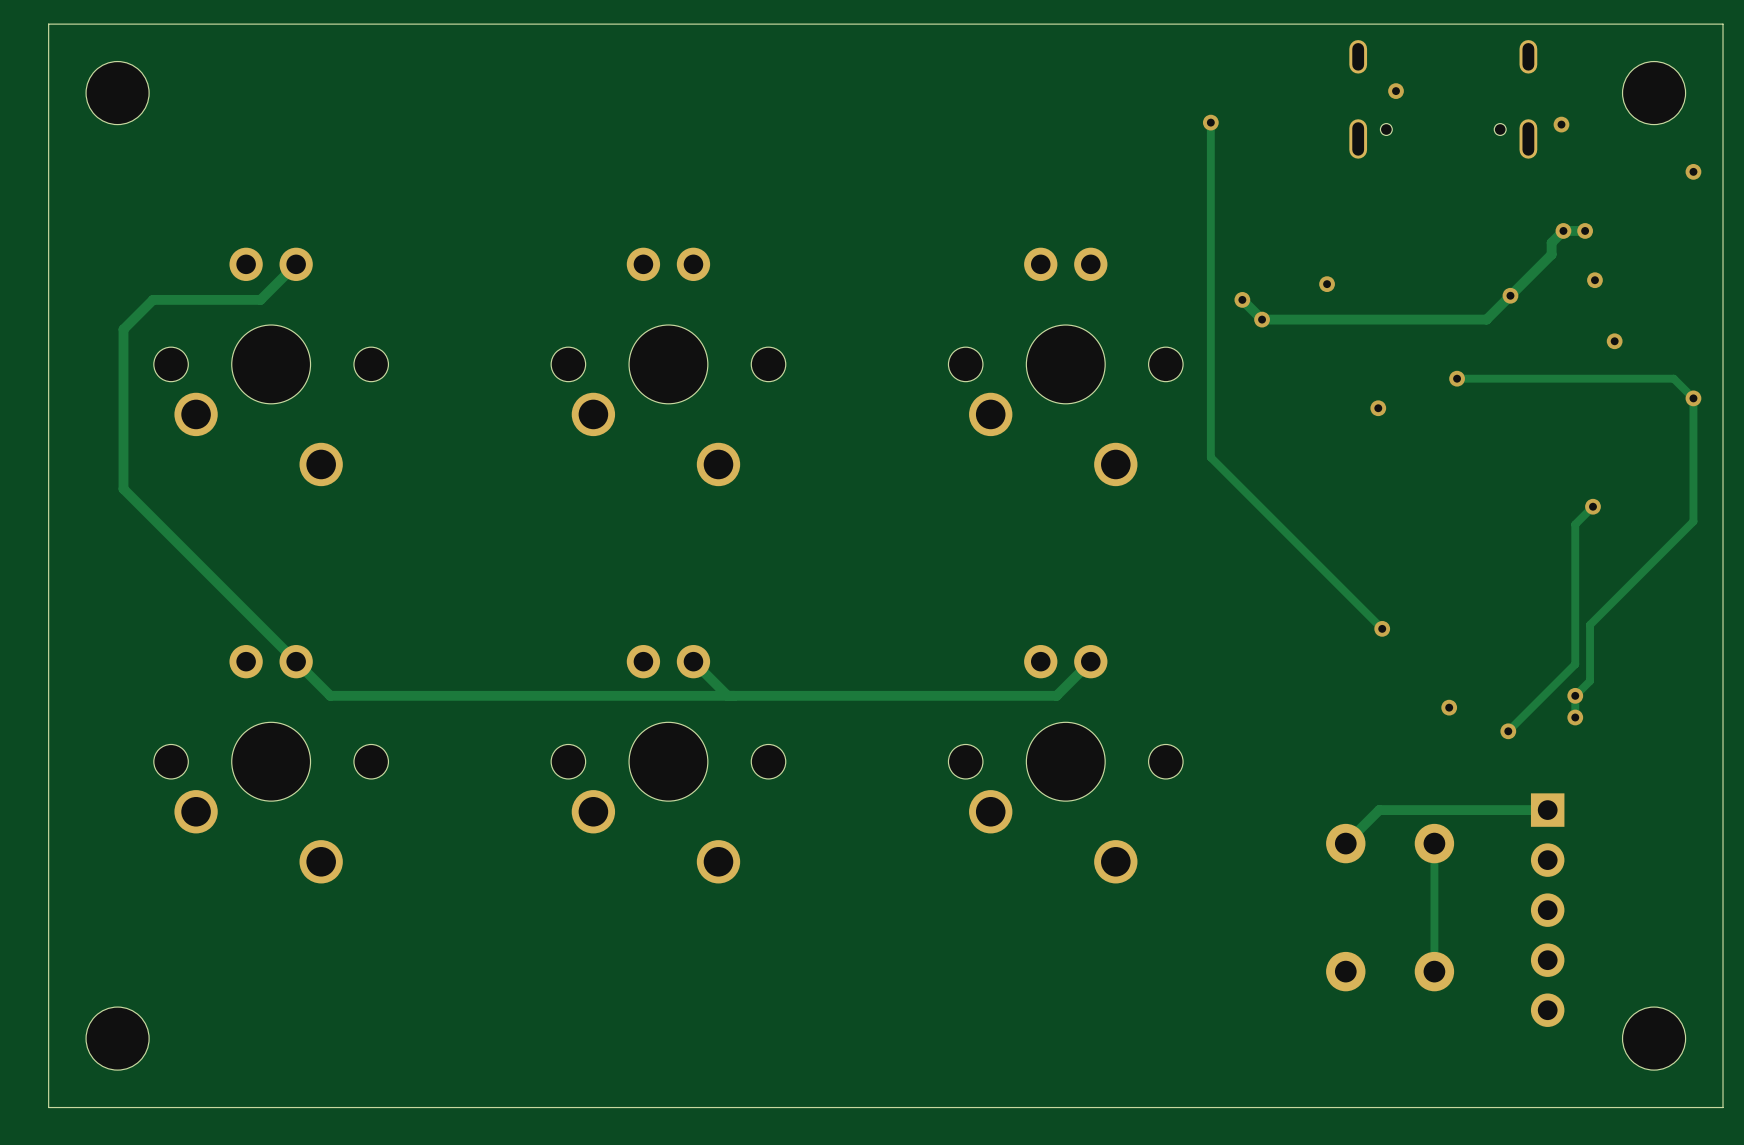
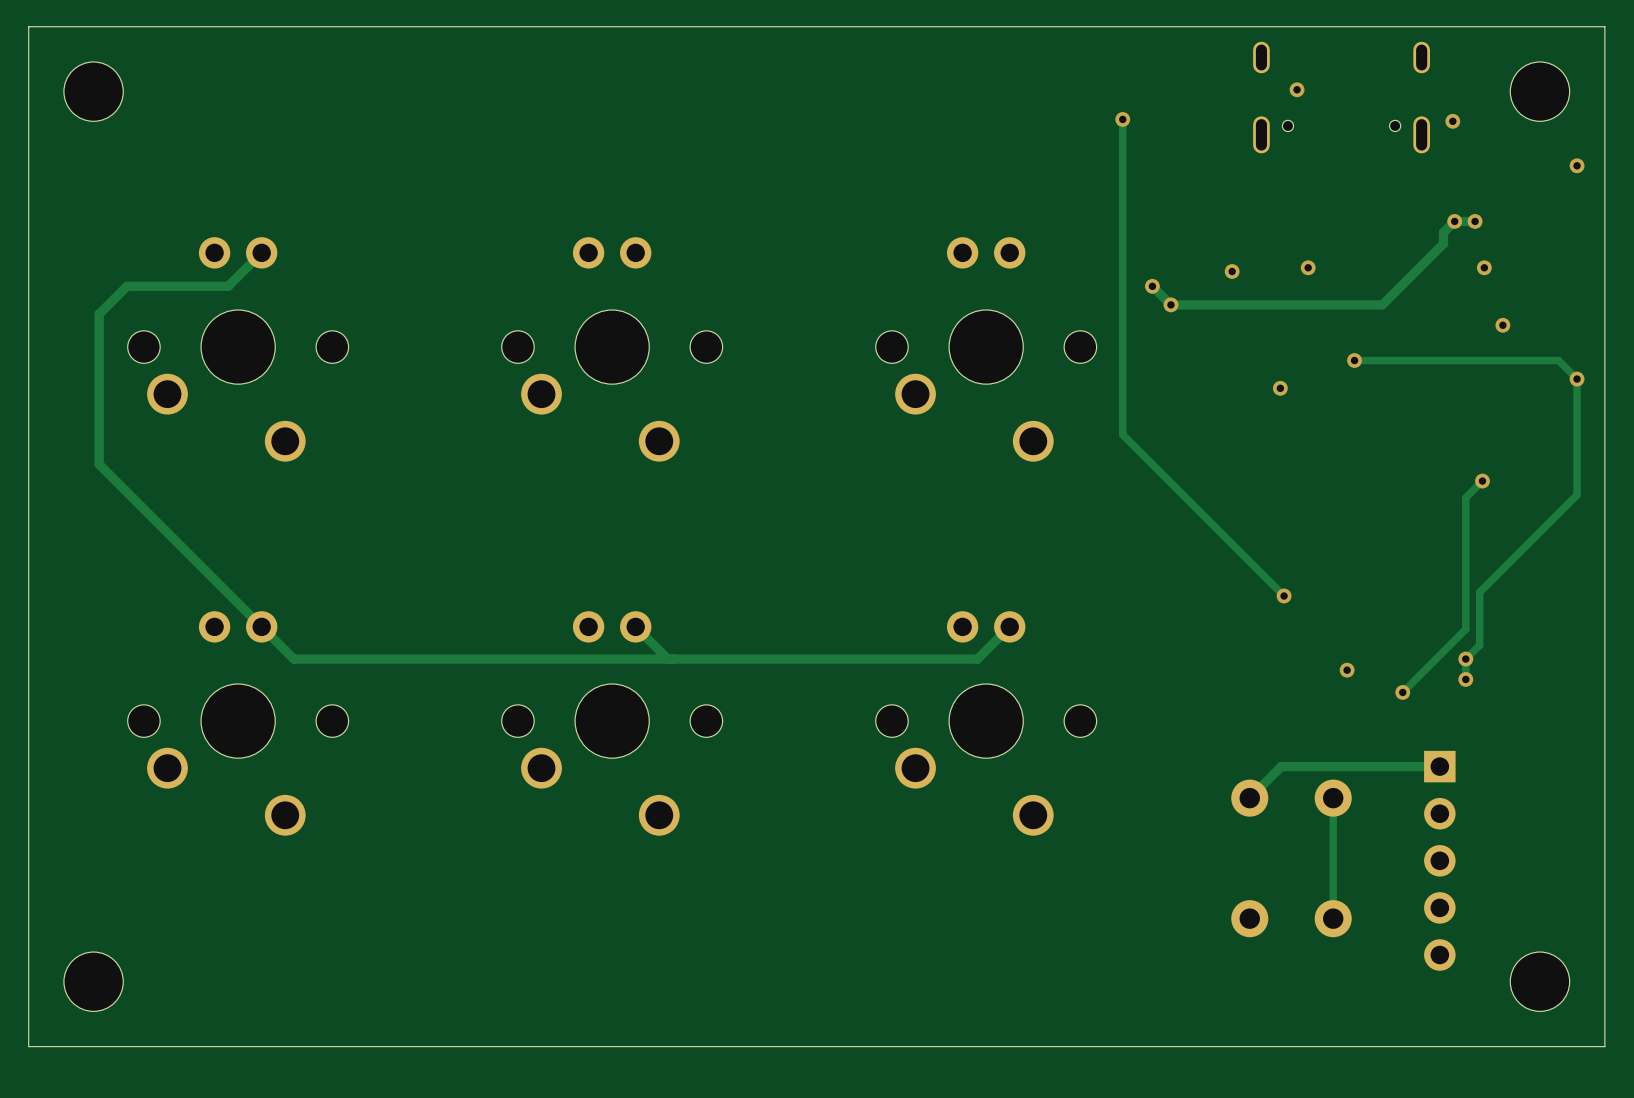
via position: (1510, 295) -> (1308, 267)

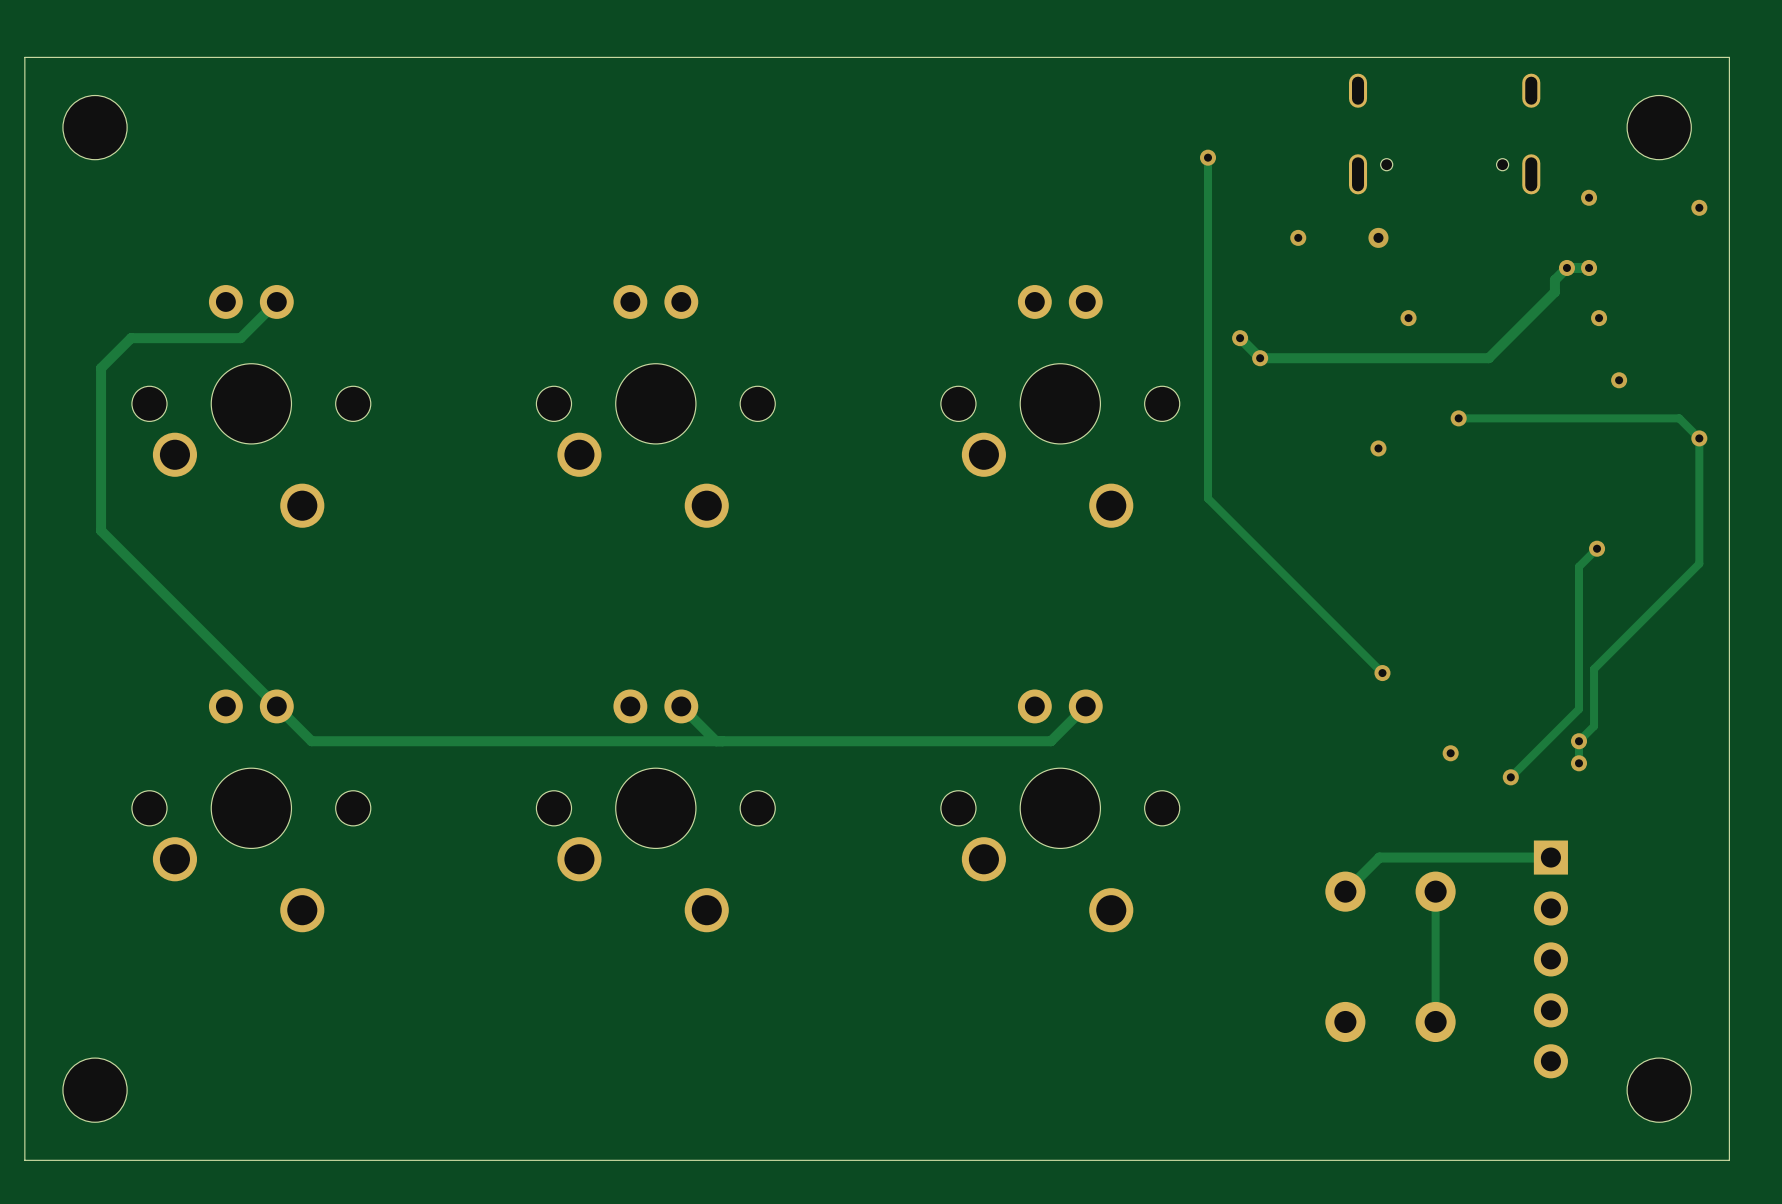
via: (1297, 89) -> none
via position: (1452, 121) -> (1589, 197)
via: none -> (1298, 237)
via: none -> (1378, 237)
via: (1232, 271) -> none

